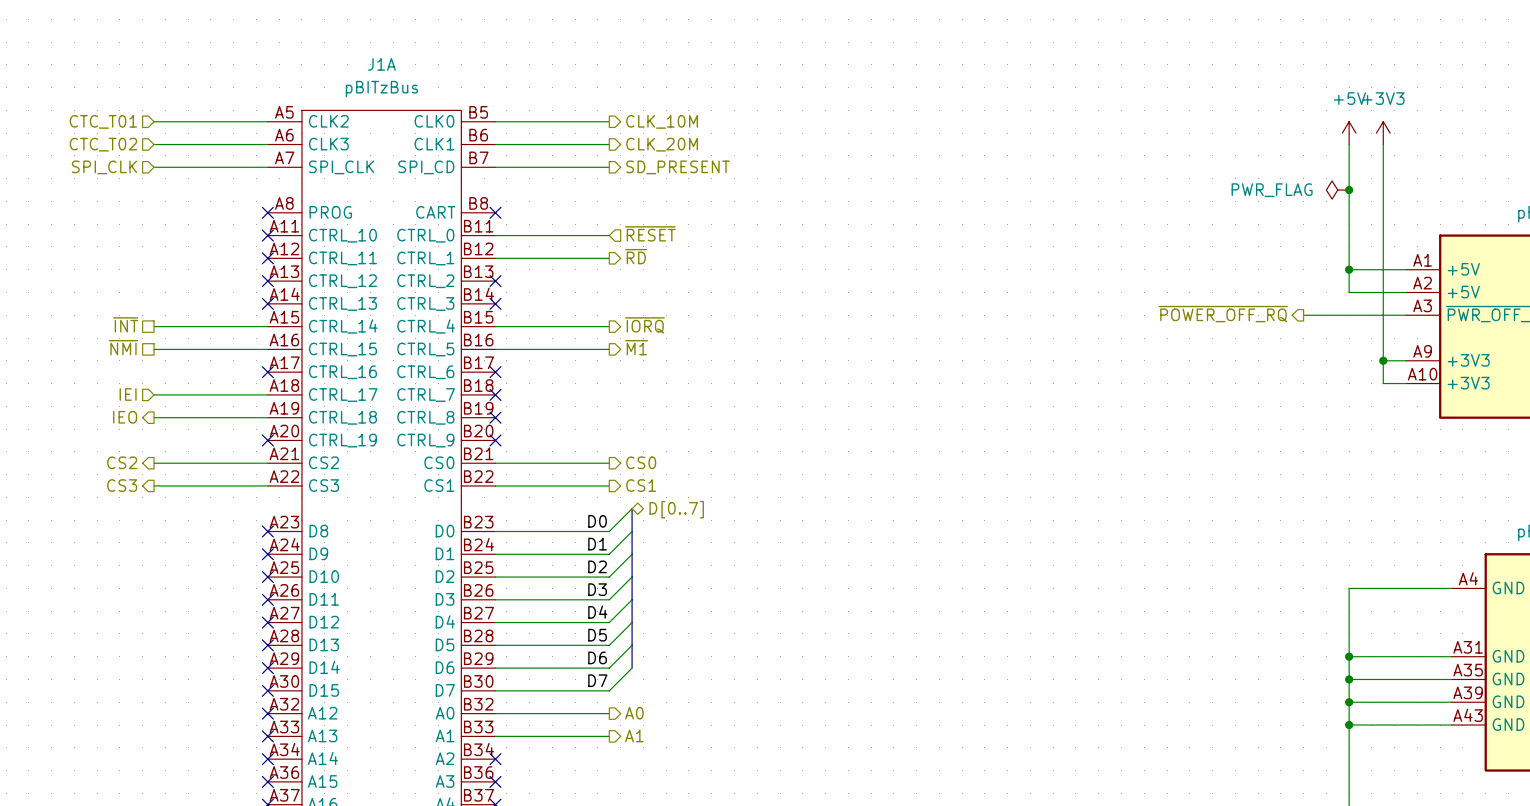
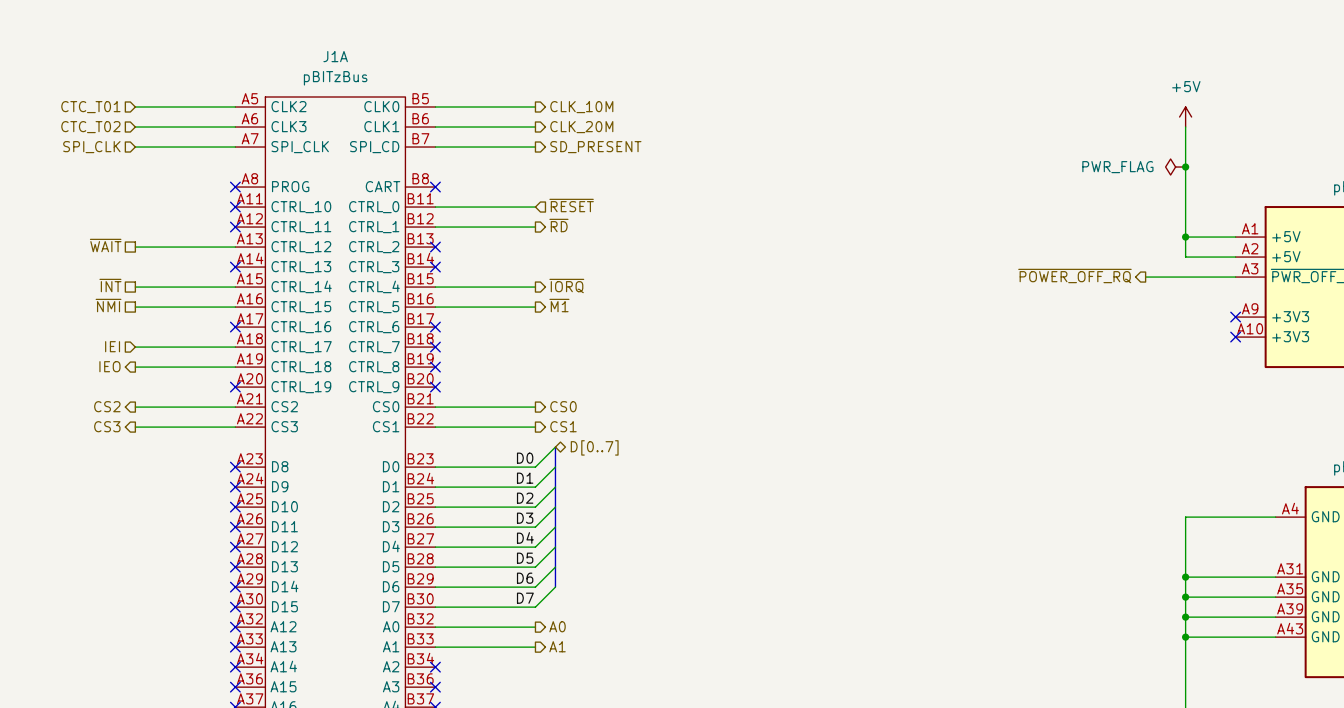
power symbol: +3V3 (1383, 133) -> none
wire: (1383, 144) (1383, 383) (1406, 383) -> none
hierarchical label: none -> ~{WAIT} (105, 245)
wire: none -> (135, 247) (235, 247)
no-connect mark: (267, 281) -> none
wire: (1383, 360) (1406, 360) -> none
junction: (1383, 360) -> none
no-connect mark: none -> (1235, 317)
no-connect mark: none -> (1235, 337)

